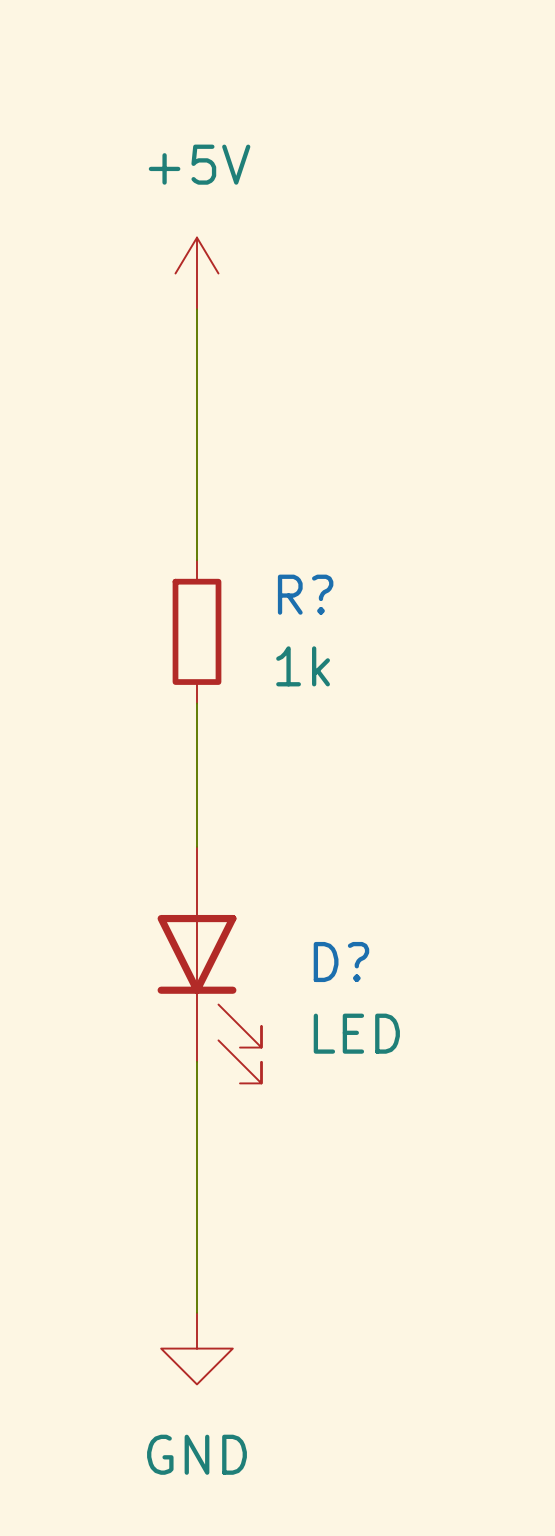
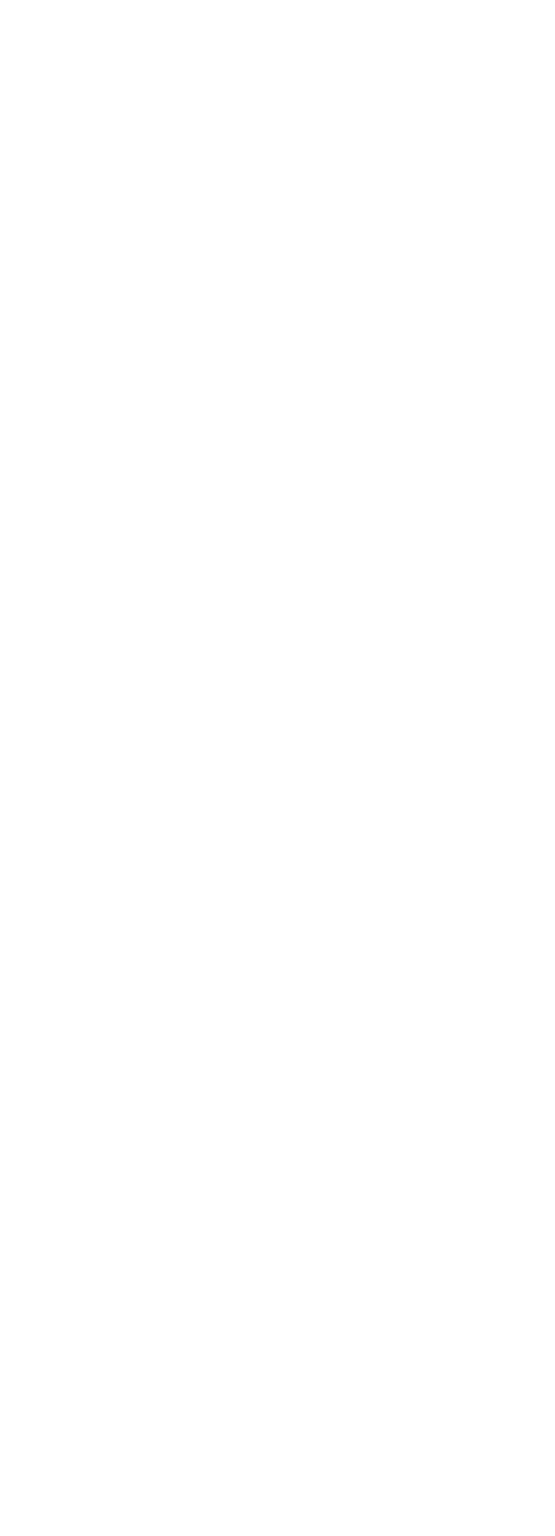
power symbol: +5V (196, 273) -> none
wire: (196, 309) (196, 560) -> none
R?: 1k (196, 631) -> none
wire: (196, 703) (196, 846) -> none
D?: LED (209, 965) -> none
wire: (196, 1061) (196, 1312) -> none
power symbol: GND (196, 1348) -> none

